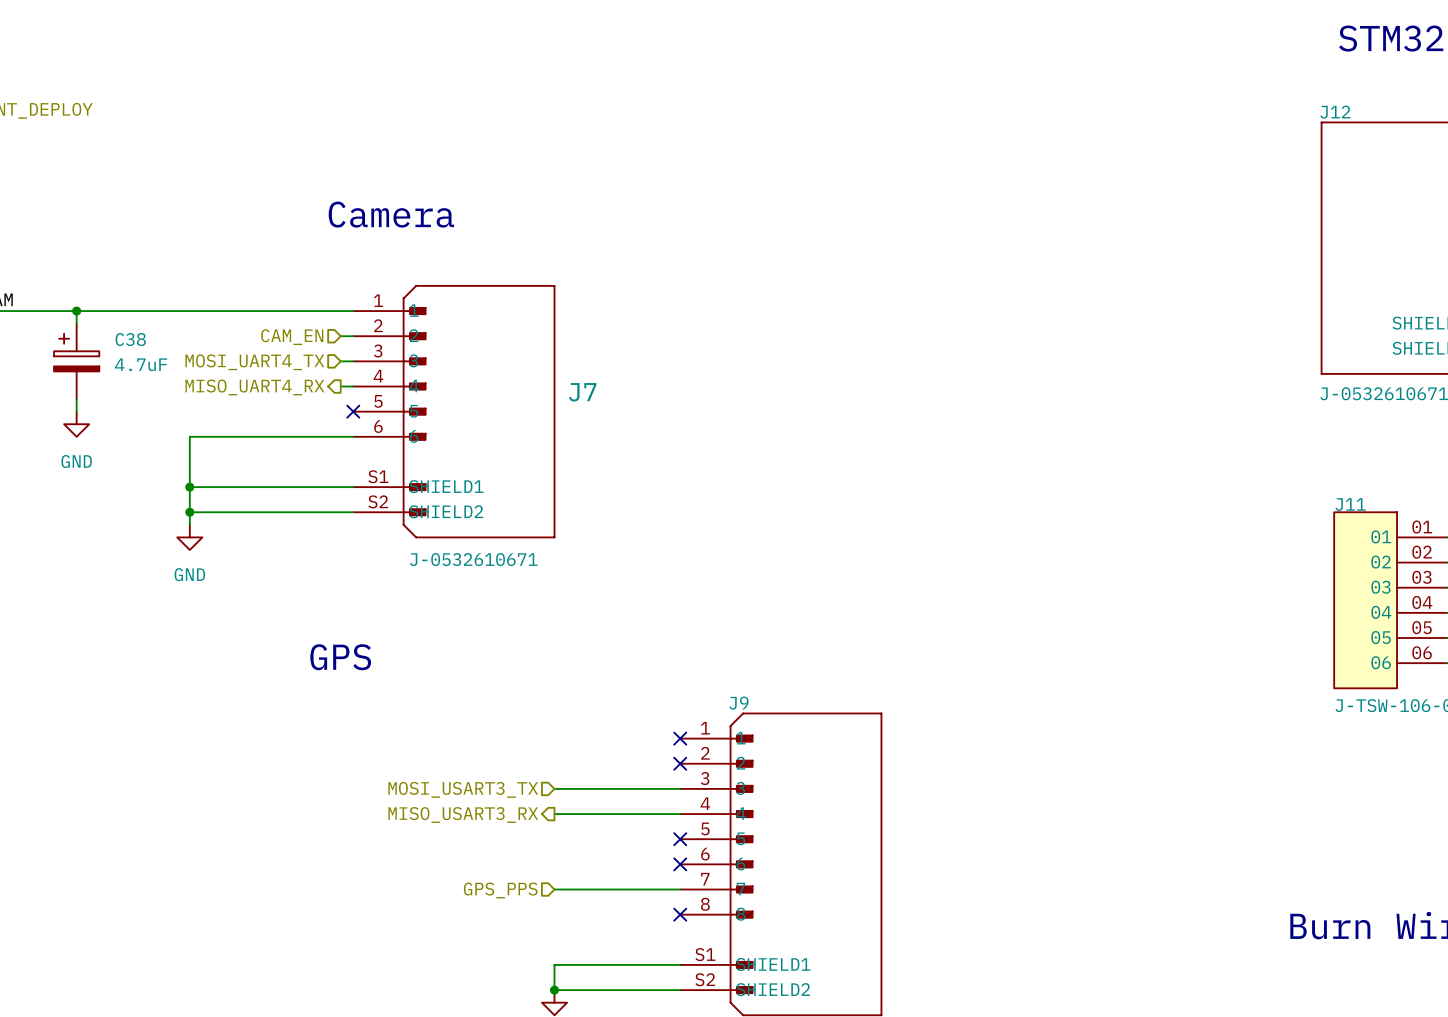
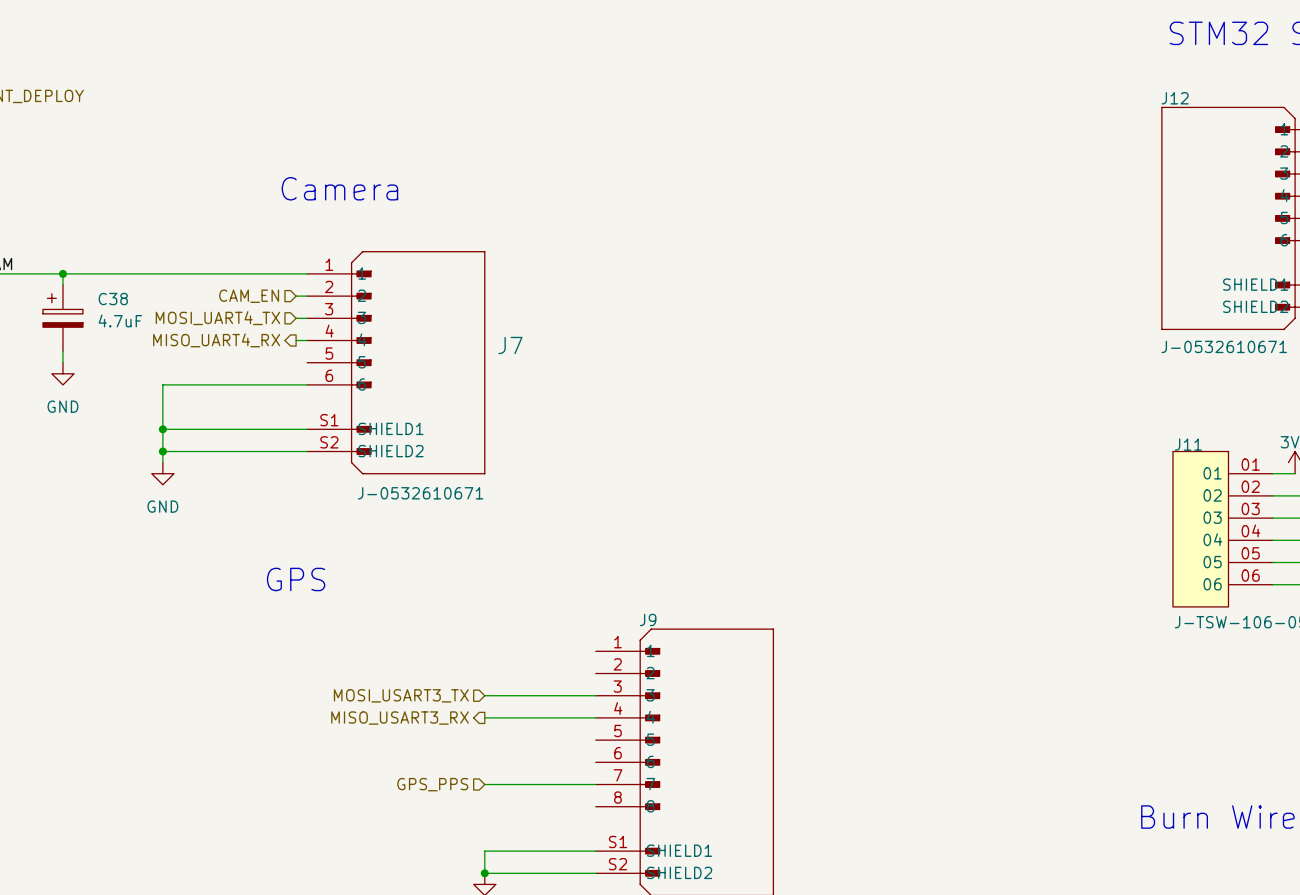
no-connect mark: (353, 411) -> none
no-connect mark: (680, 738) -> none
no-connect mark: (680, 763) -> none
no-connect mark: (680, 839) -> none
no-connect mark: (680, 864) -> none
no-connect mark: (680, 914) -> none

